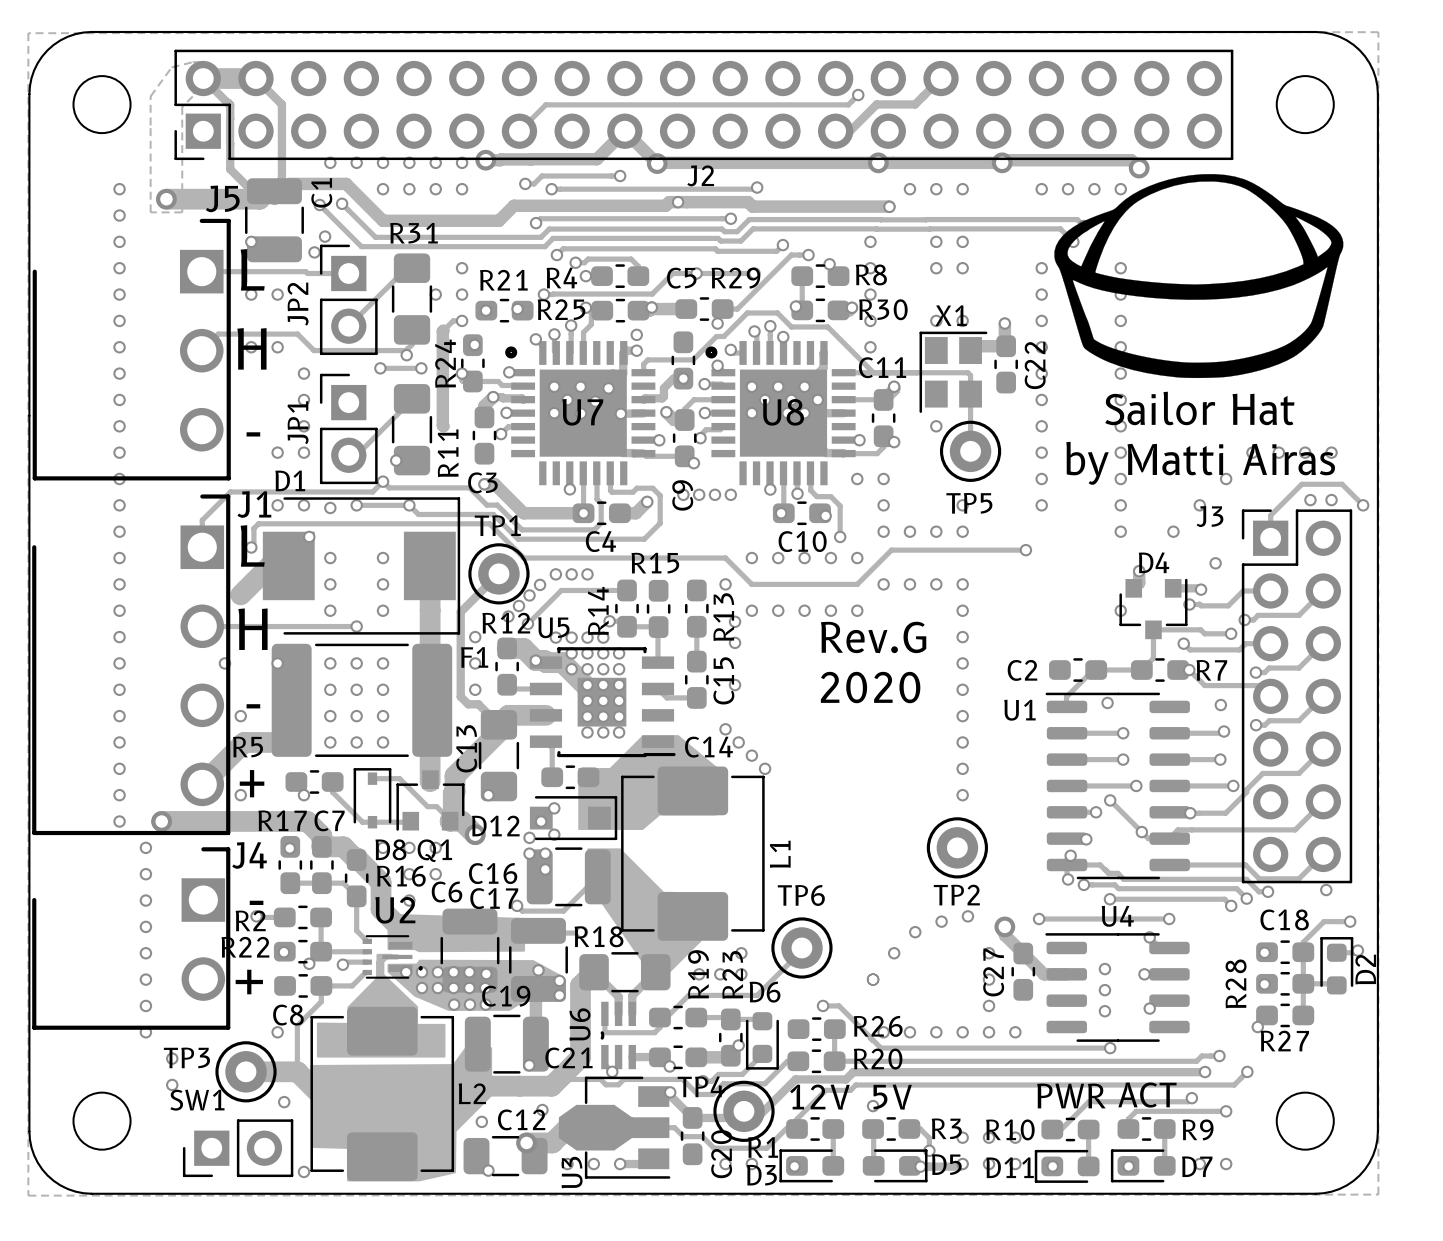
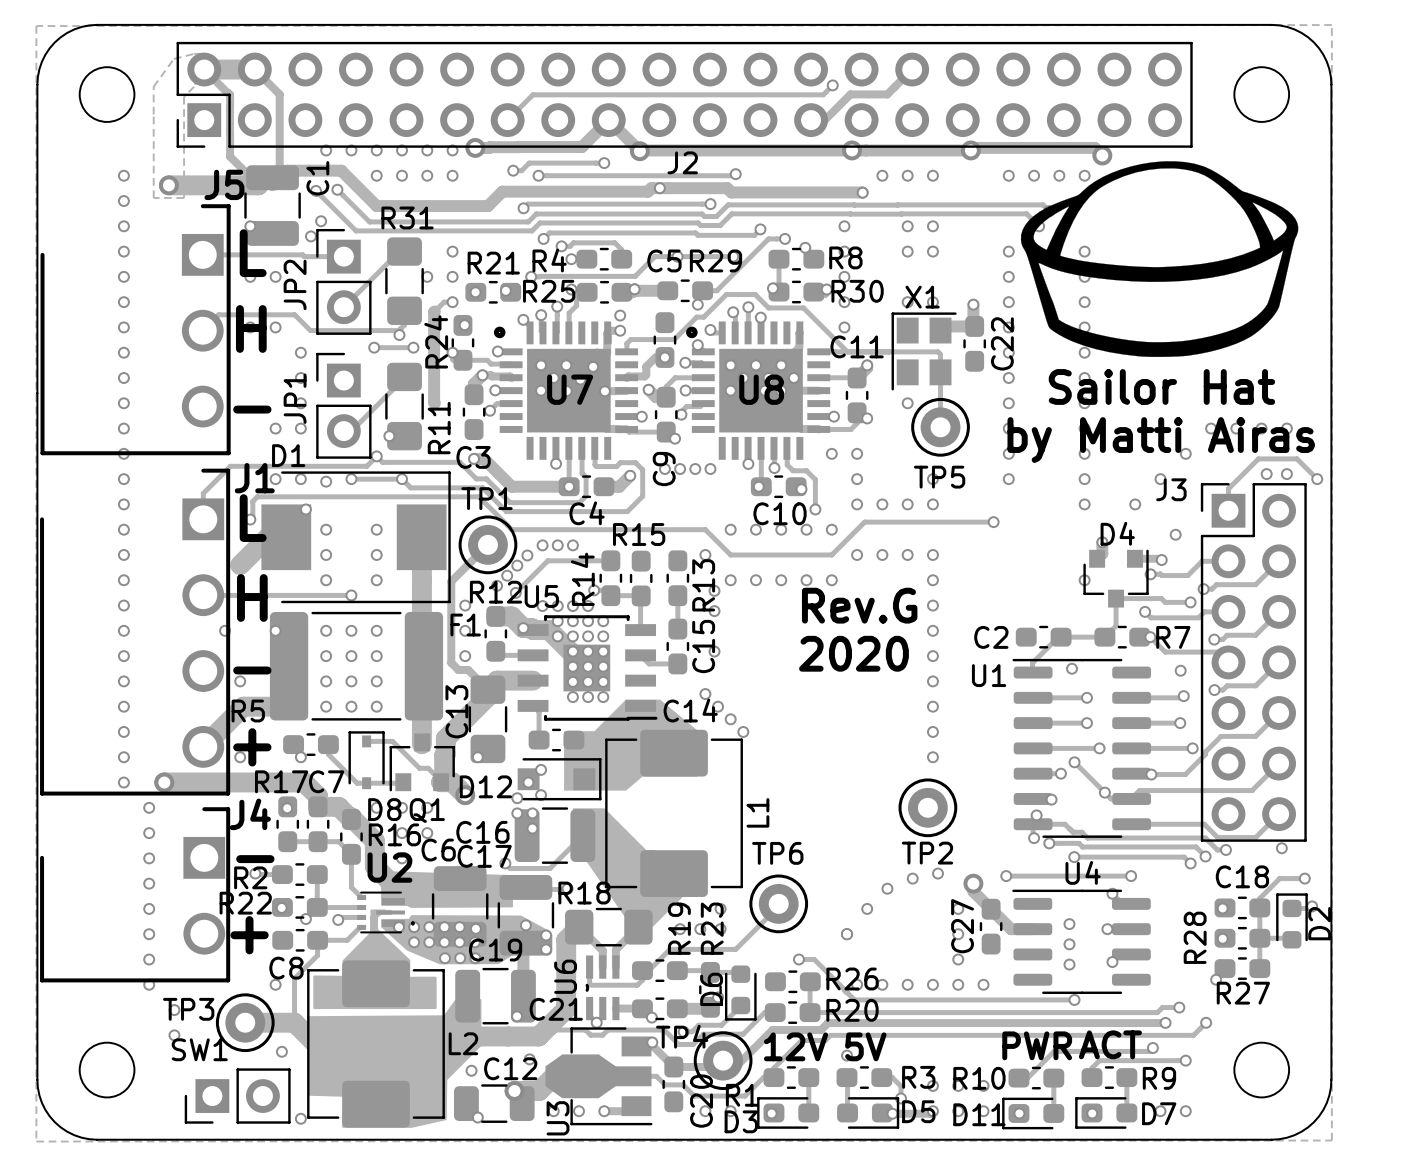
D6 name rotation: 0° (765, 992) -> 90° counterclockwise (711, 989)
D6 name position: D6 (765, 992) -> D6 (711, 989)

